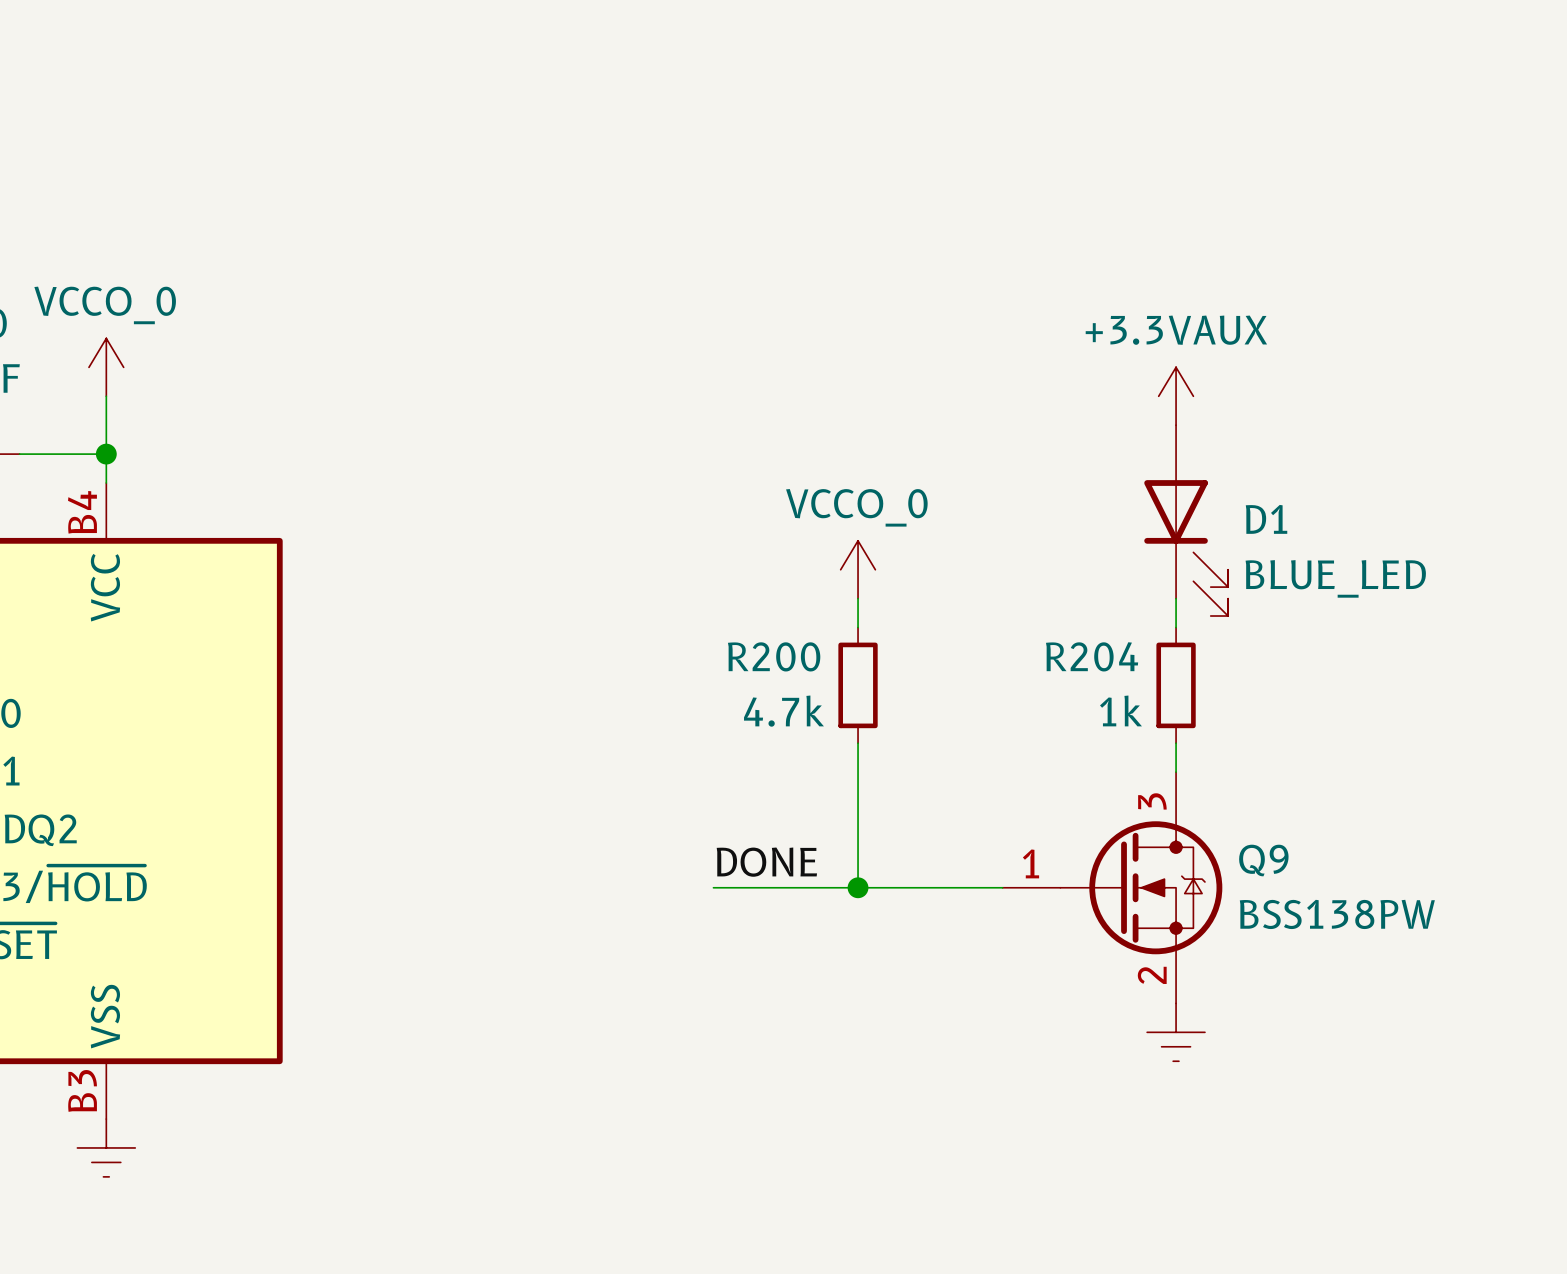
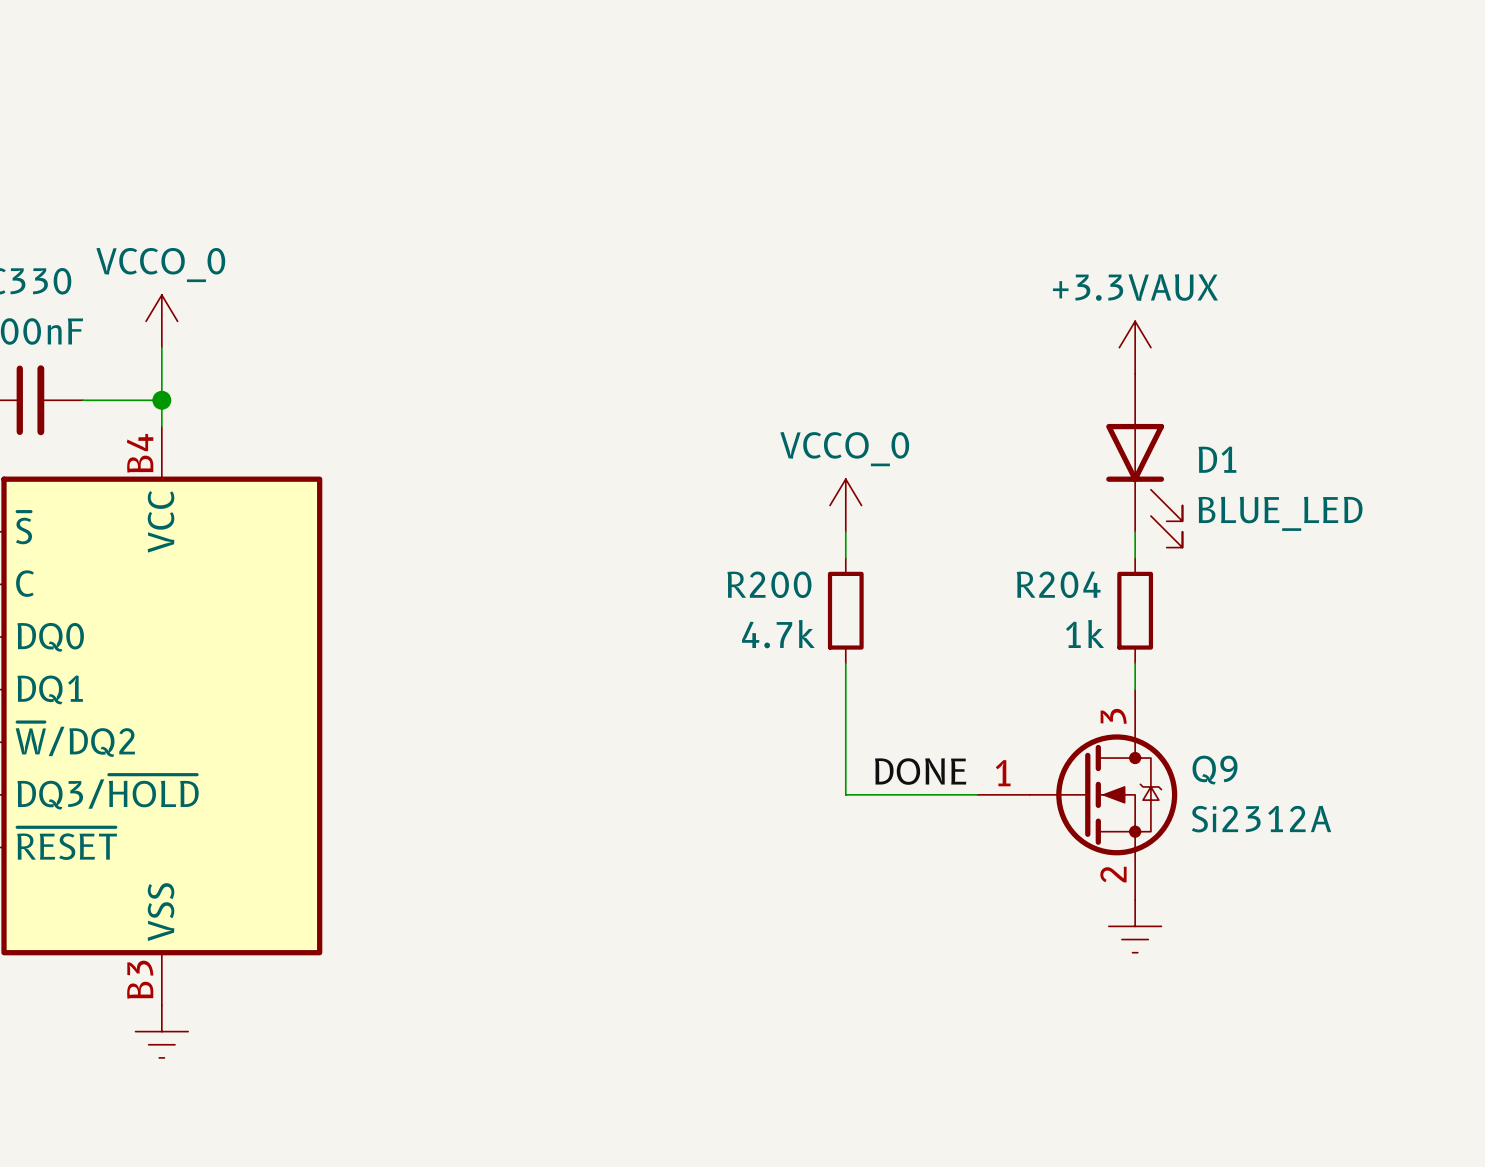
label position: DONE (766, 862) -> DONE (920, 771)
wire: (713, 887) (858, 887) -> none
junction: (858, 887) -> none
Q9 value: BSS138PW (1337, 914) -> Si2312A (1261, 819)

